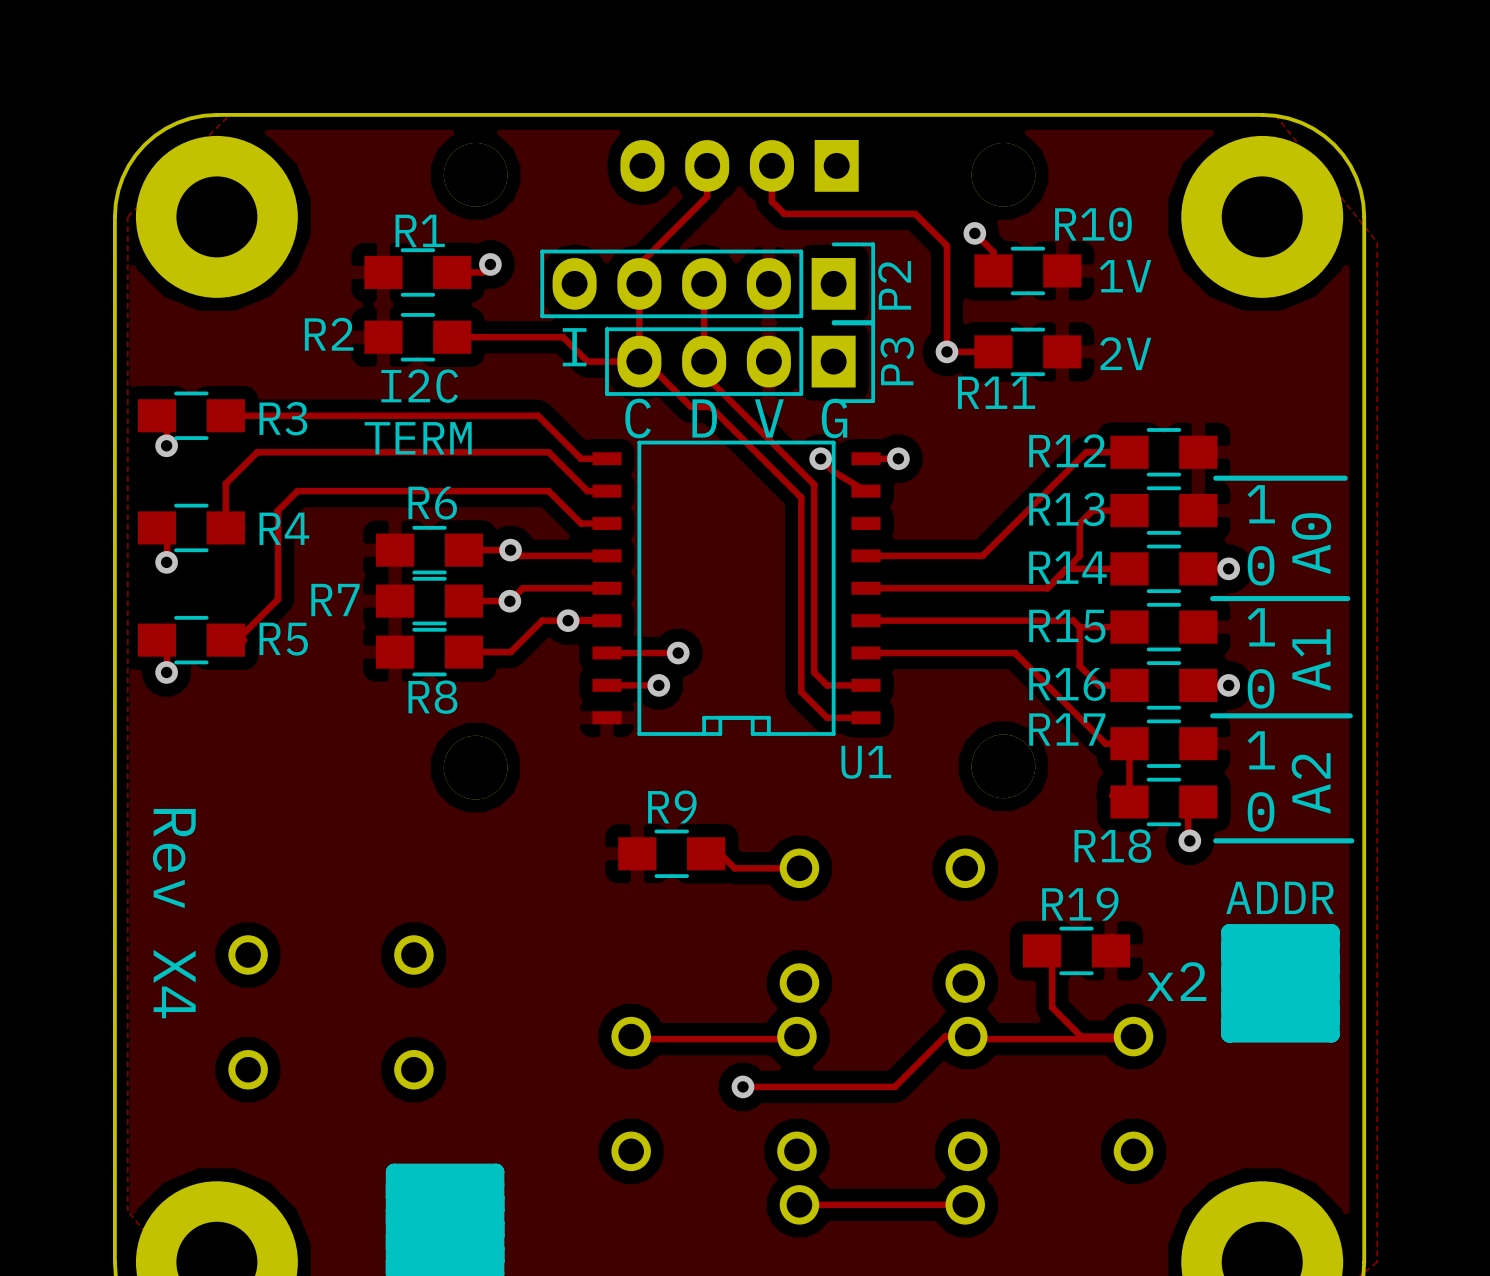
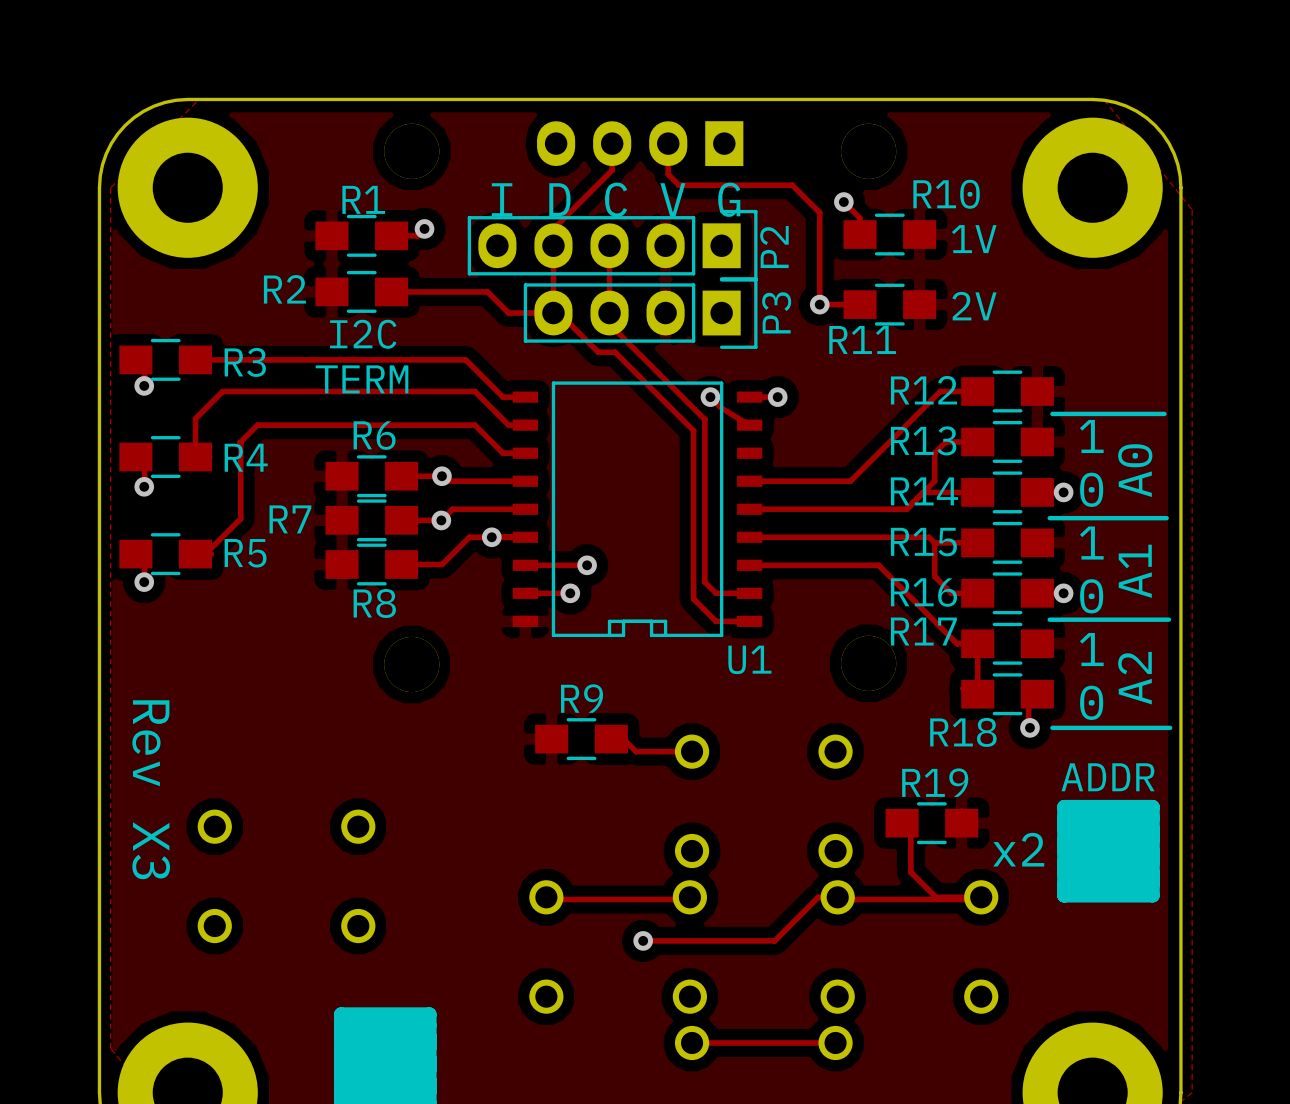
text: none -> I D C V G (616, 199)
text: I (574, 347) -> none
text: C D V G (736, 418) -> none
text: Rev X4 (174, 913) -> Rev X3 (151, 789)

